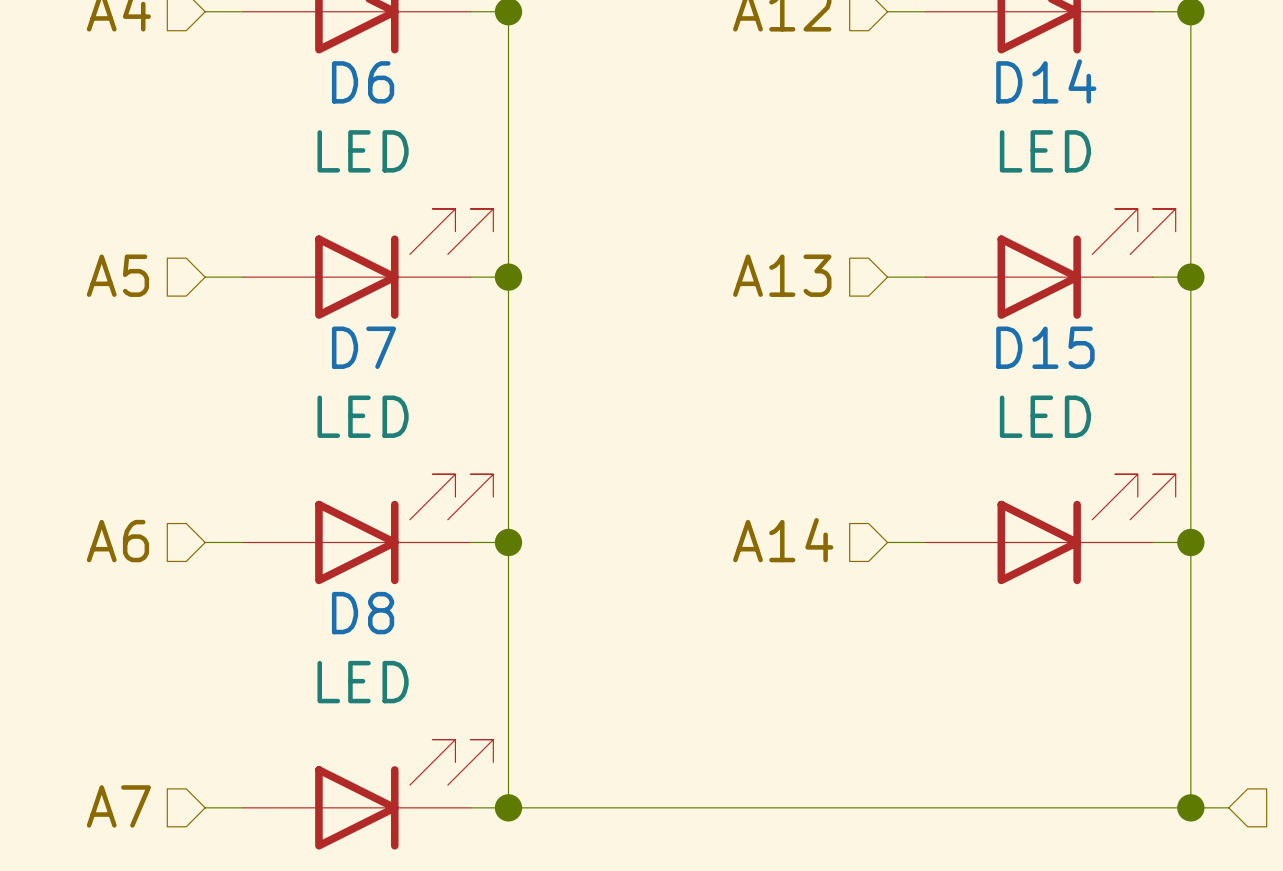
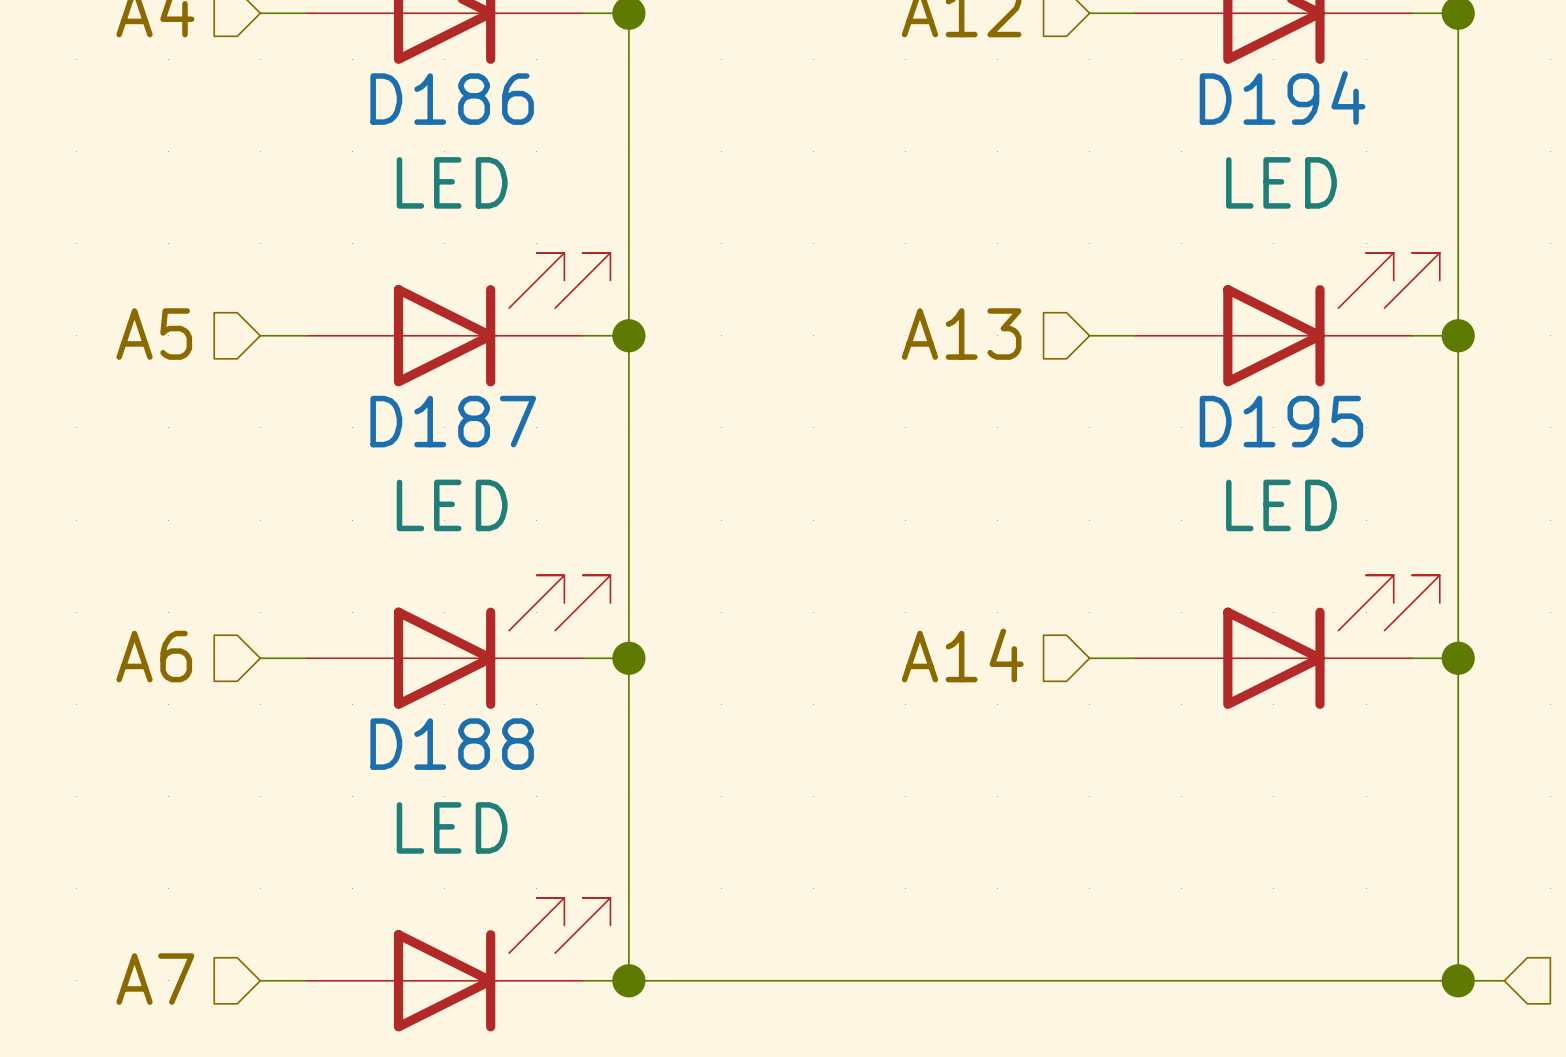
D14 name: D14 (1046, 81) -> D194 (1282, 97)
D6 name: D6 (363, 82) -> D186 (452, 99)
D7 name: D7 (363, 347) -> D187 (453, 421)
D15 name: D15 (1045, 347) -> D195 (1281, 421)
D8 name: D8 (363, 613) -> D188 (452, 744)

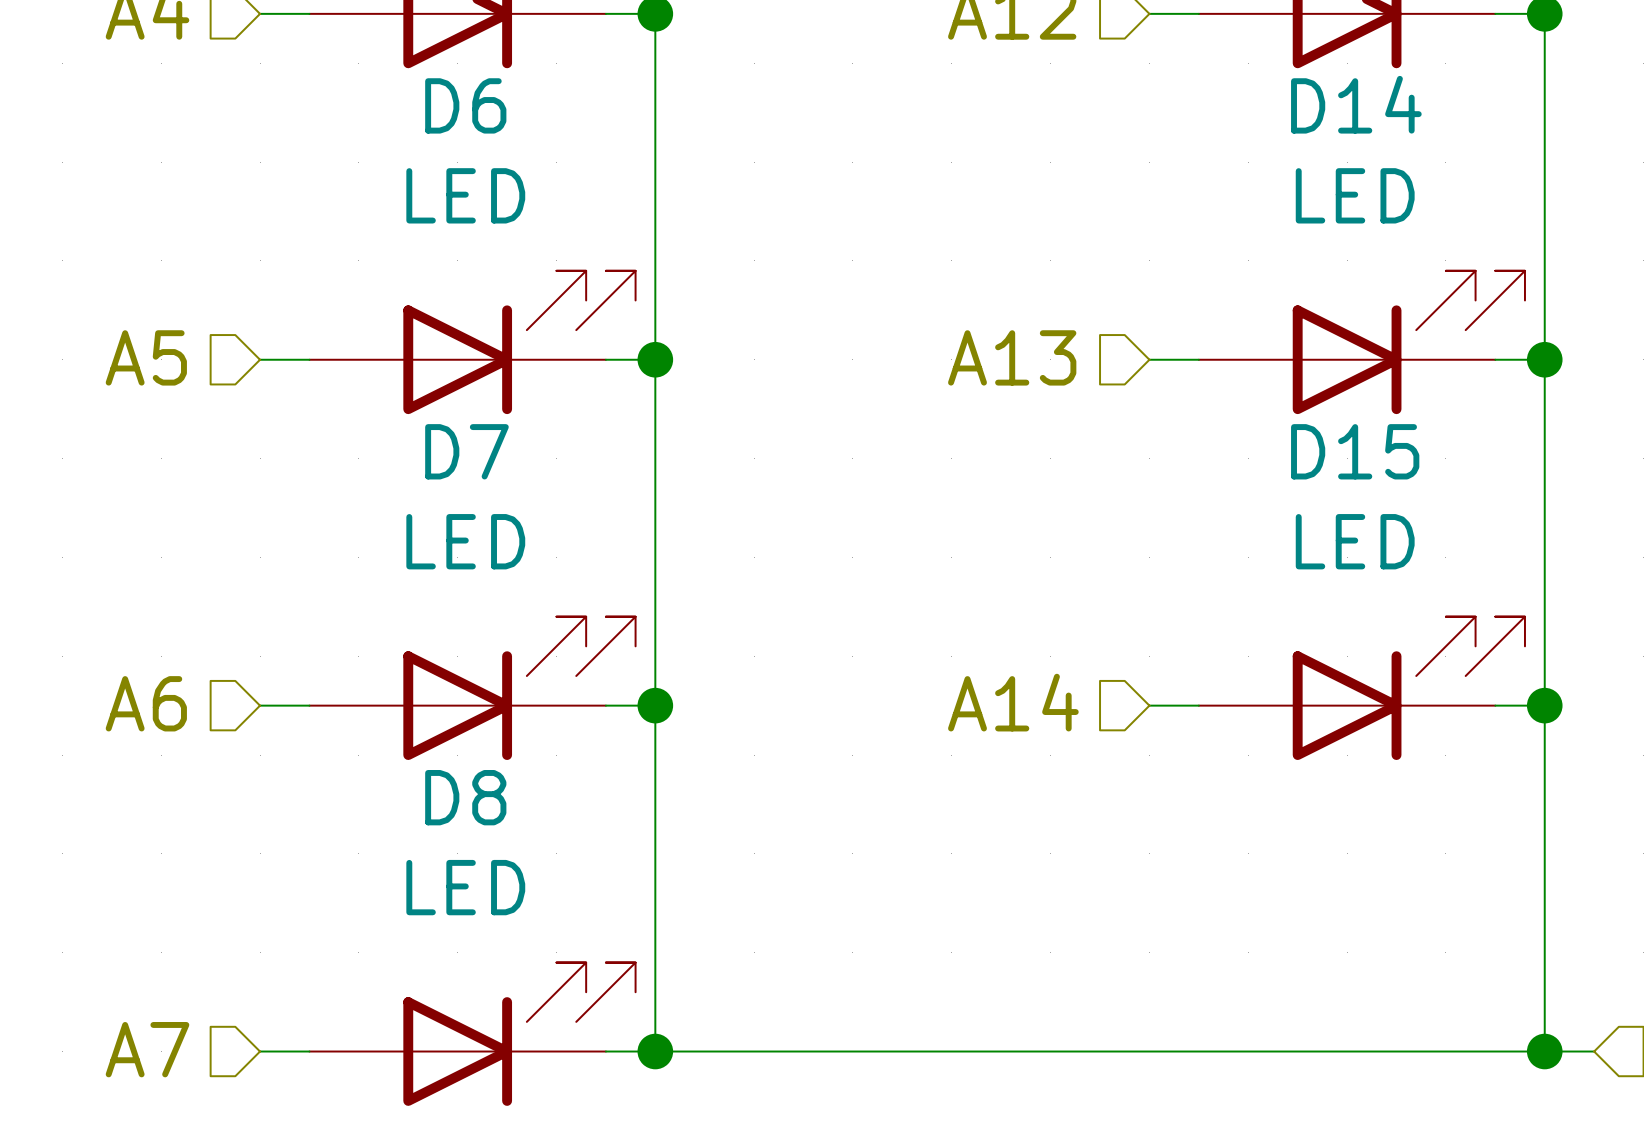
D194 name: D194 (1282, 97) -> D14 (1356, 104)
D186 name: D186 (452, 99) -> D6 (465, 105)
D187 name: D187 (453, 421) -> D7 (466, 451)
D195 name: D195 (1281, 421) -> D15 (1355, 451)
D188 name: D188 (452, 744) -> D8 (465, 797)

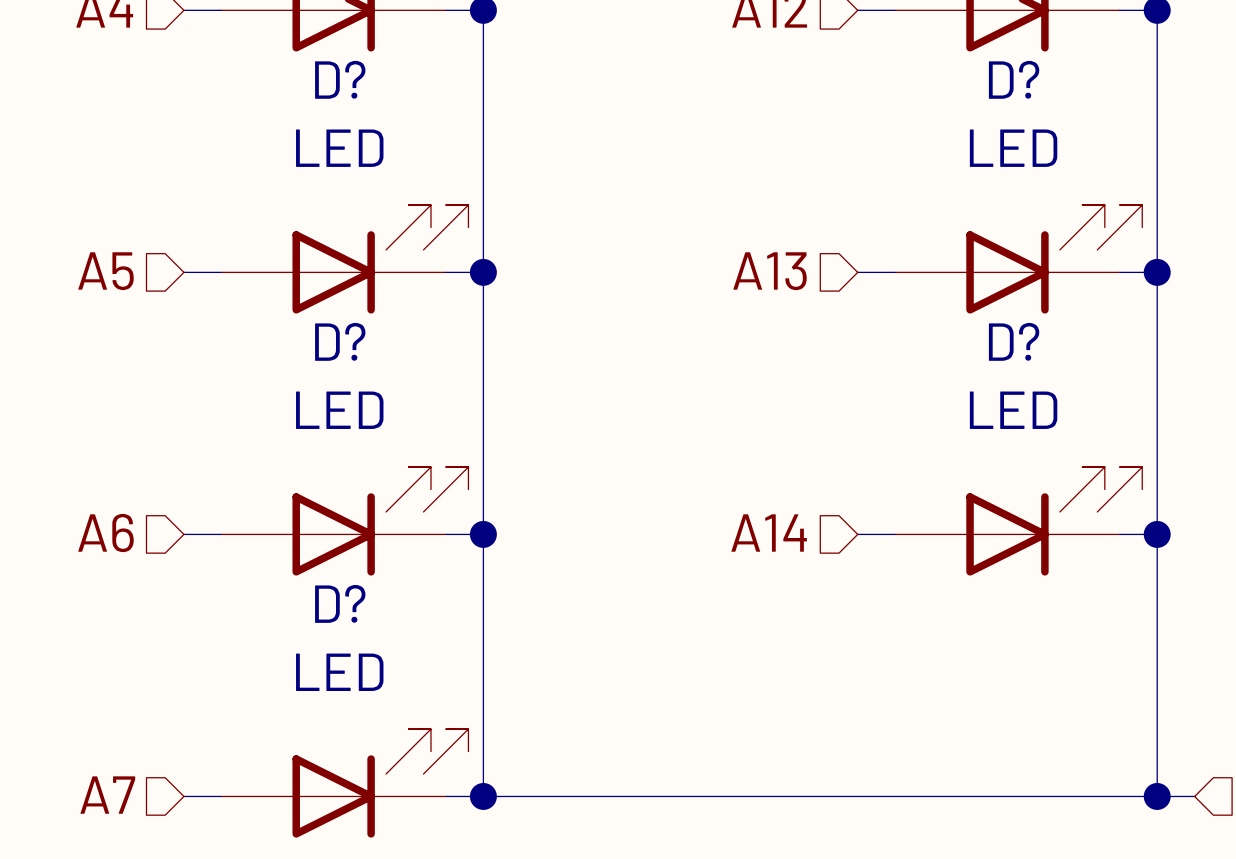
D14 name: D14 (1356, 104) -> D? (1014, 79)
D6 name: D6 (465, 105) -> D? (340, 79)
D7 name: D7 (466, 451) -> D? (340, 341)
D15 name: D15 (1355, 451) -> D? (1014, 341)
D8 name: D8 (465, 797) -> D? (340, 603)

